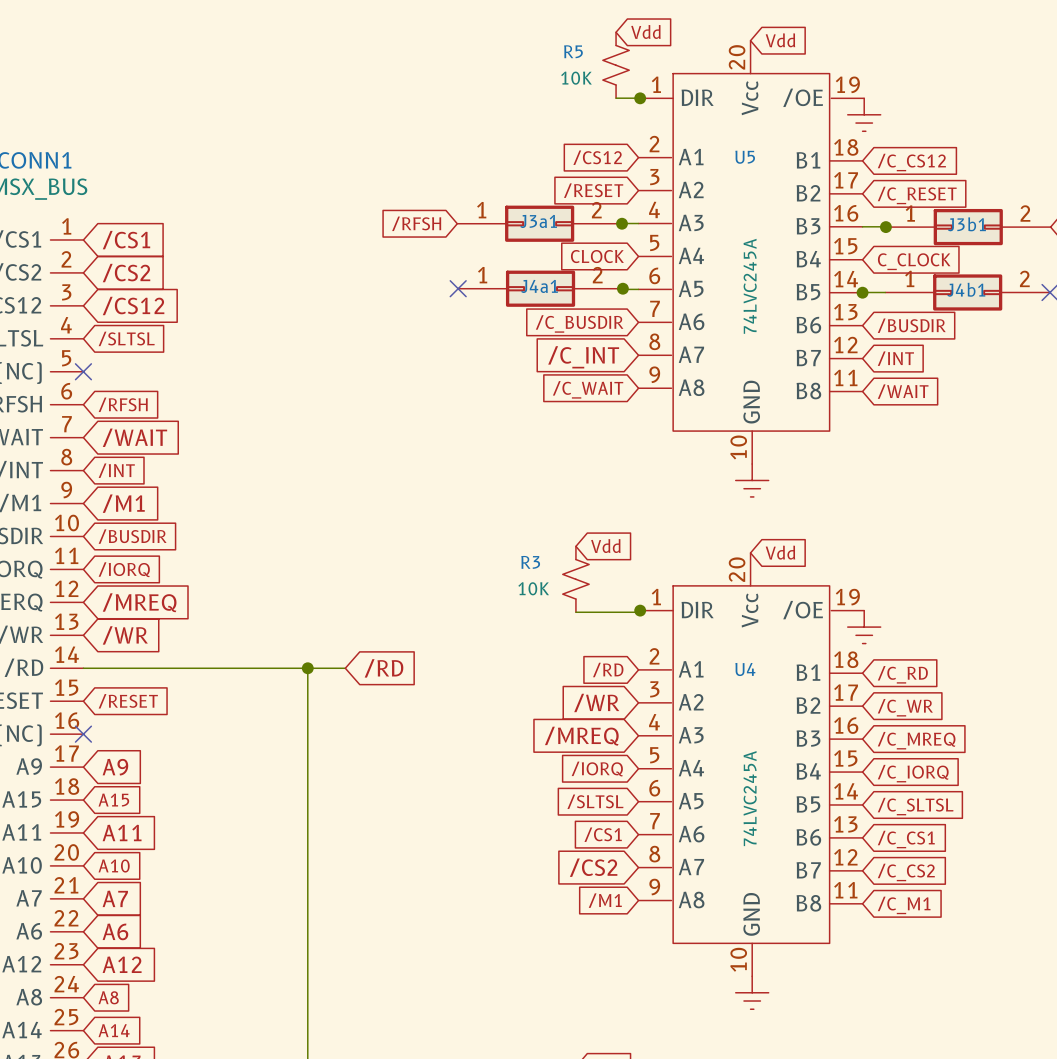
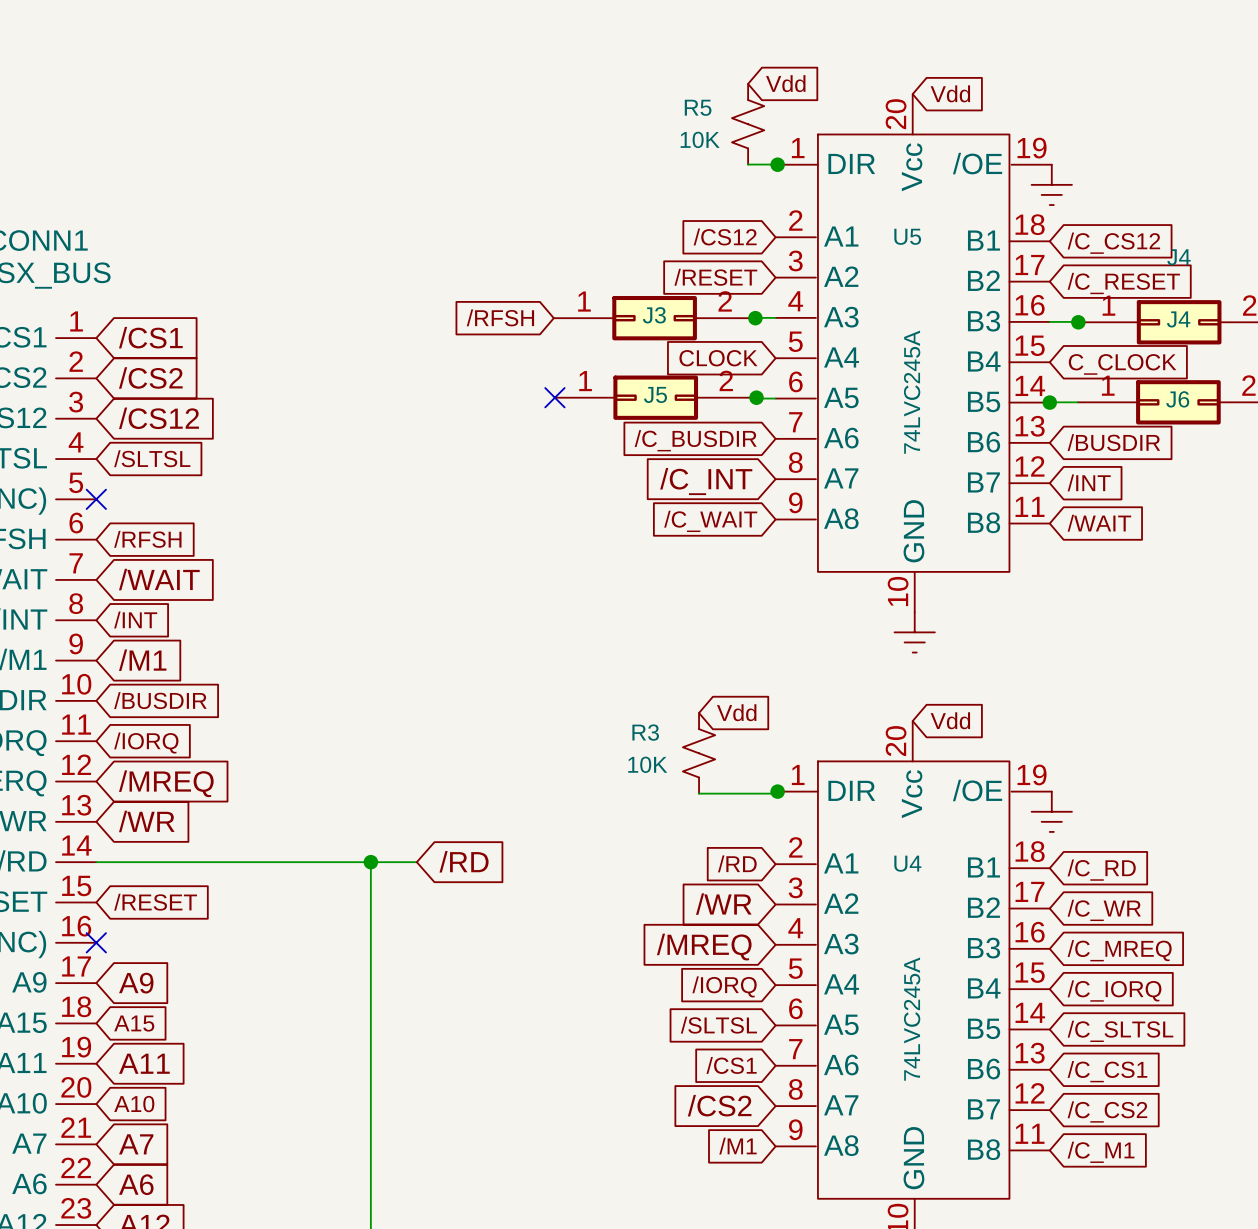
J3b1 value: none -> J4 (1178, 257)
J3a1 name: J3a1 (538, 221) -> J3 (654, 315)
J3b1 name: J3b1 (966, 224) -> J4 (1178, 319)
J4a1 name: J4a1 (539, 286) -> J5 (655, 394)
J4b1 name: J4b1 (966, 289) -> J6 (1177, 399)

